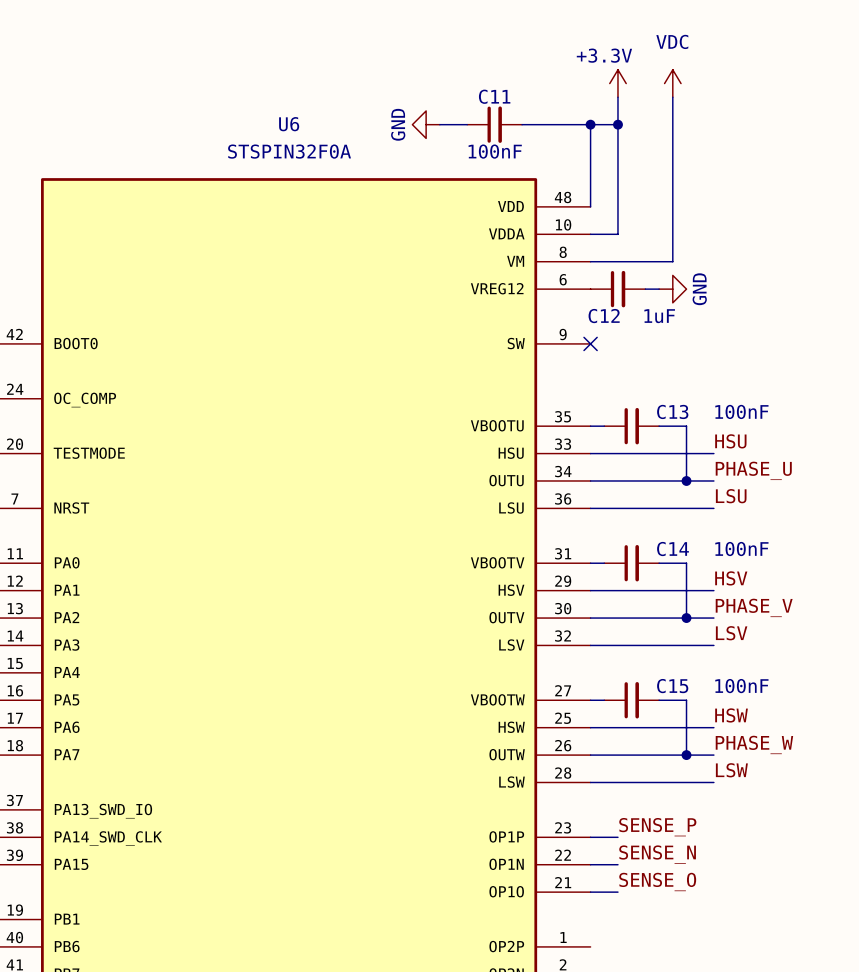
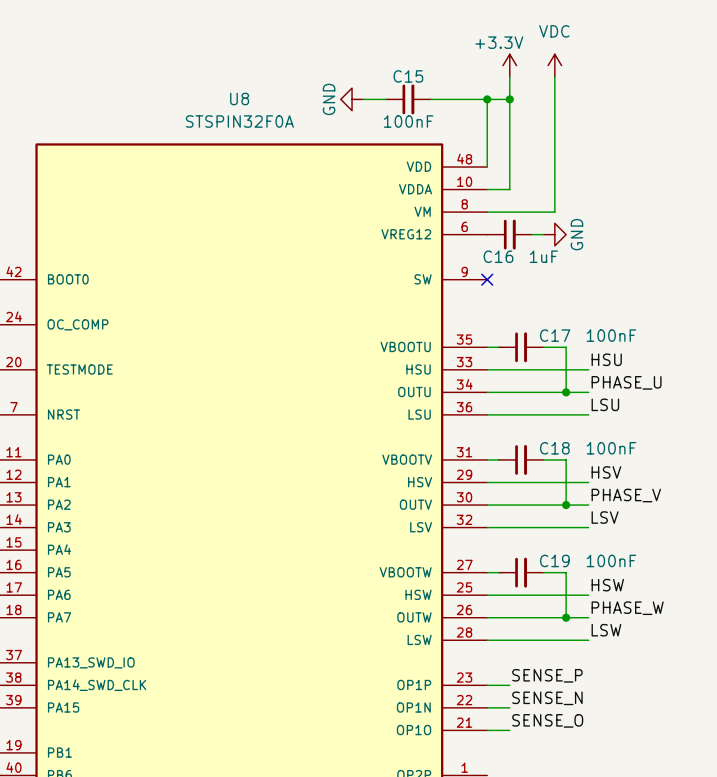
C11 name: C11 (494, 96) -> C15 (408, 76)
U6 name: U6 (289, 124) -> U8 (239, 98)
C12 name: C12 (604, 316) -> C16 (498, 256)
C13 name: C13 (672, 411) -> C17 (555, 335)
C14 name: C14 (672, 549) -> C18 (554, 448)
C15 name: C15 (672, 686) -> C19 (554, 560)

